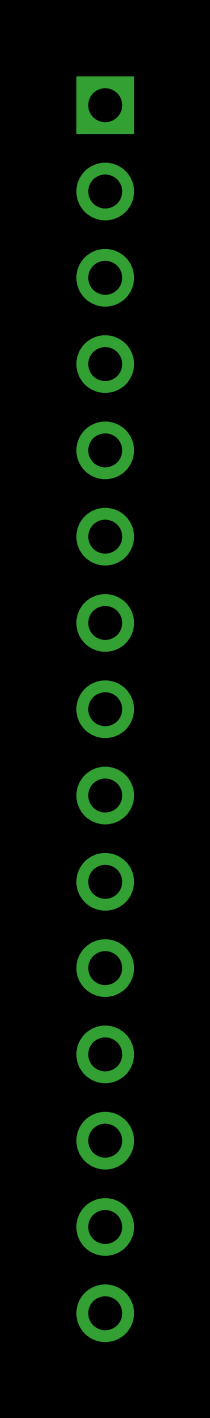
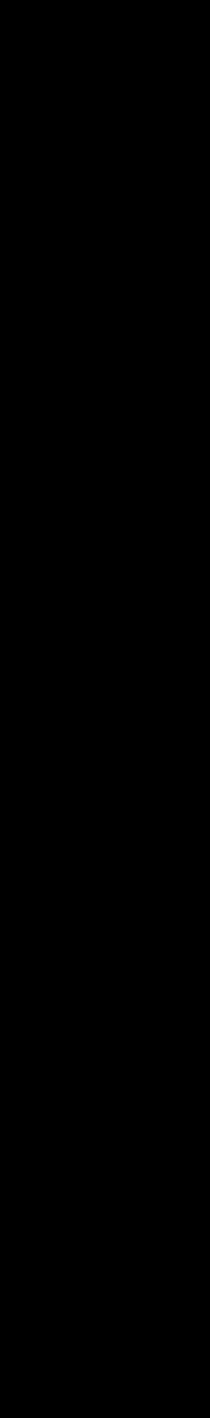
part: (105, 709) -> none

